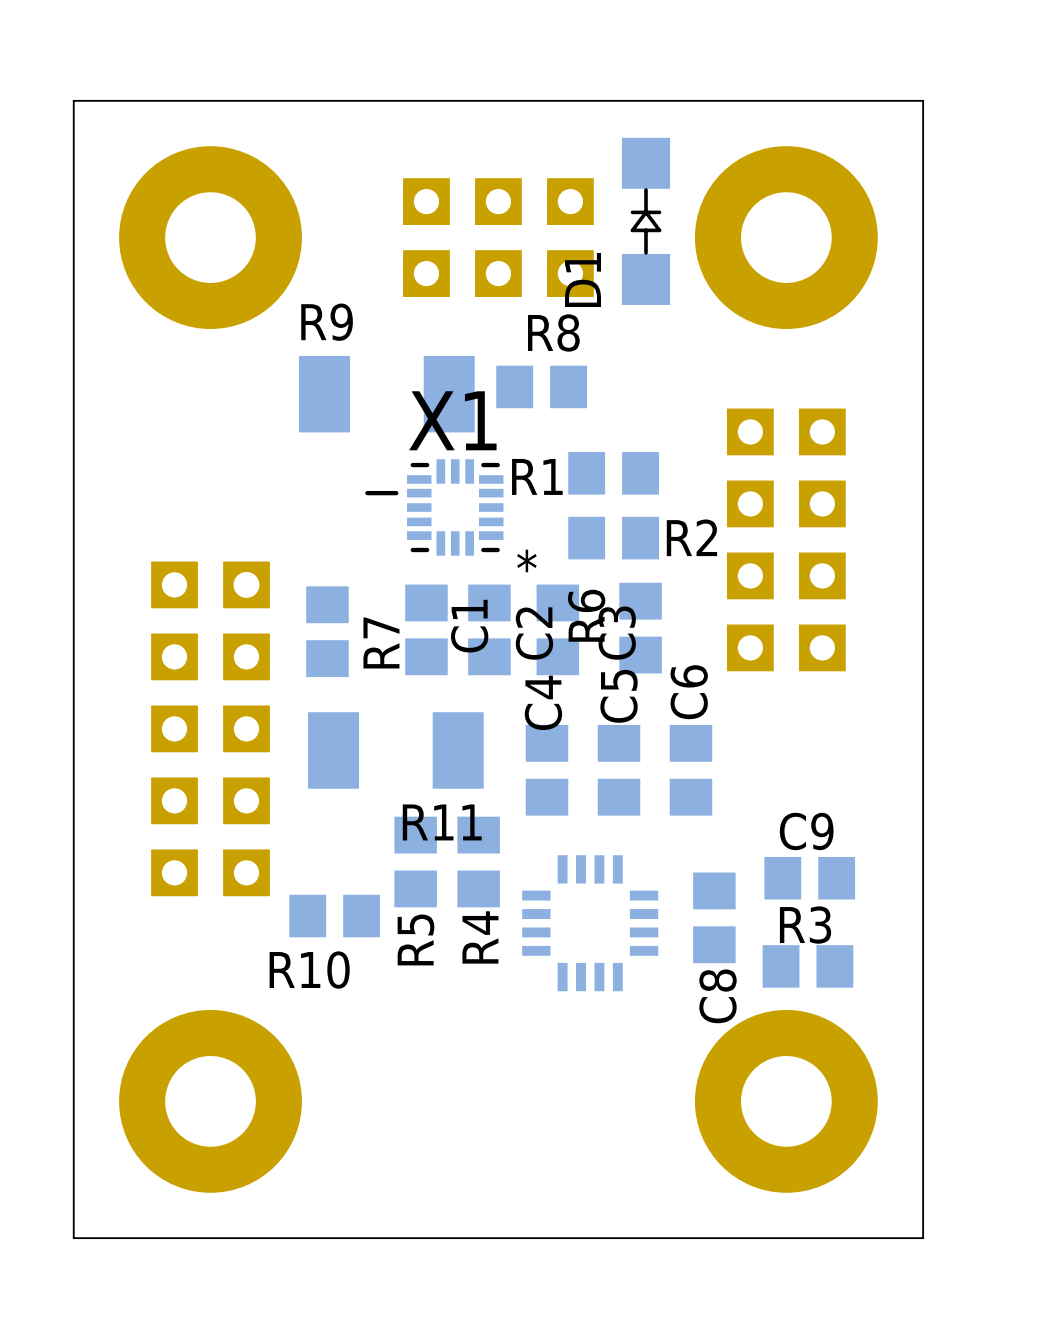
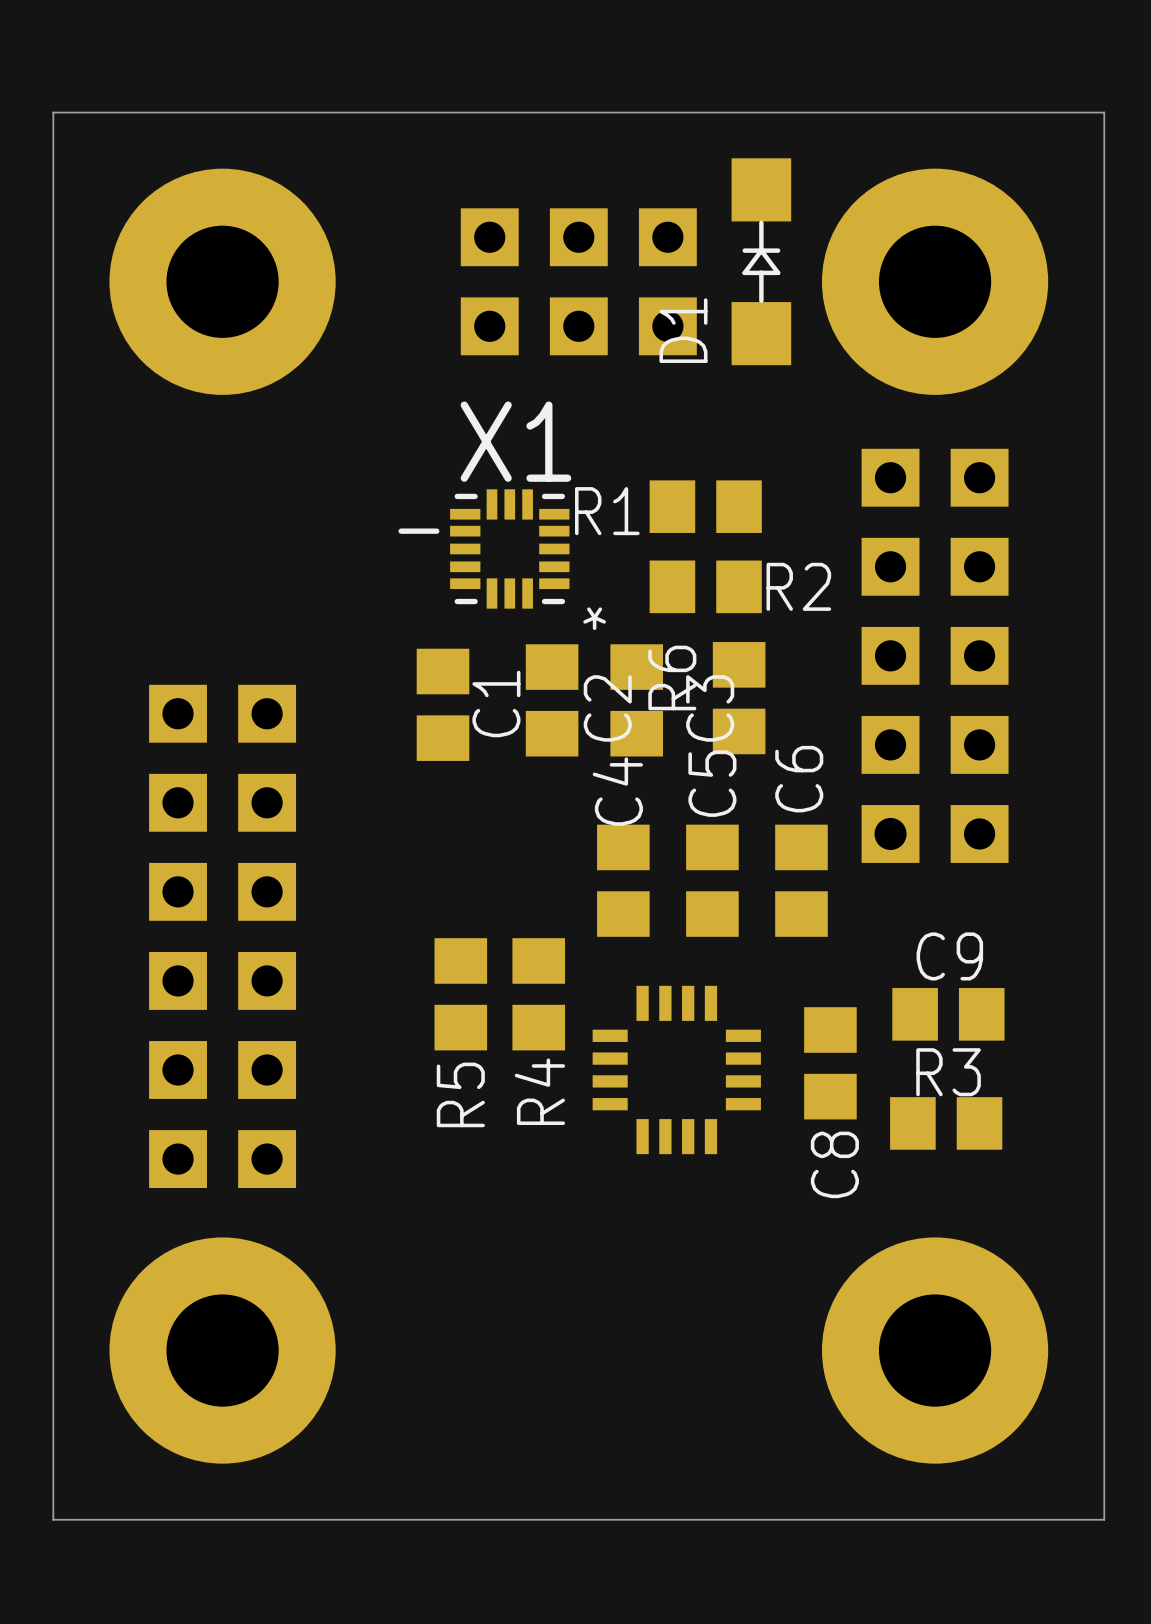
R8: (541, 386) -> none
R9: (386, 394) -> none
part footprint: [726, 408, 846, 672] -> [861, 448, 1009, 863]
R1 position: (613, 473) -> (705, 506)
X1 position: (434, 507) -> (483, 548)
R2 position: (613, 538) -> (705, 586)
R6 position: (640, 628) -> (739, 698)
C1 position: (426, 629) -> (442, 704)
C2 position: (489, 629) -> (552, 700)
C3 position: (557, 629) -> (636, 700)
R7: (327, 631) -> none
part: (210, 728) -> none
R11: (395, 750) -> none
part: none -> (222, 936)
C4 position: (547, 770) -> (623, 880)
C5 position: (619, 770) -> (712, 880)
C6 position: (690, 770) -> (801, 880)
R5 position: (415, 862) -> (460, 994)
R4 position: (478, 862) -> (538, 994)
C9 position: (809, 878) -> (948, 1014)
R10: (334, 916) -> none
C8 position: (714, 917) -> (830, 1063)
part position: (590, 923) -> (676, 1069)
R3 position: (807, 966) -> (946, 1123)

